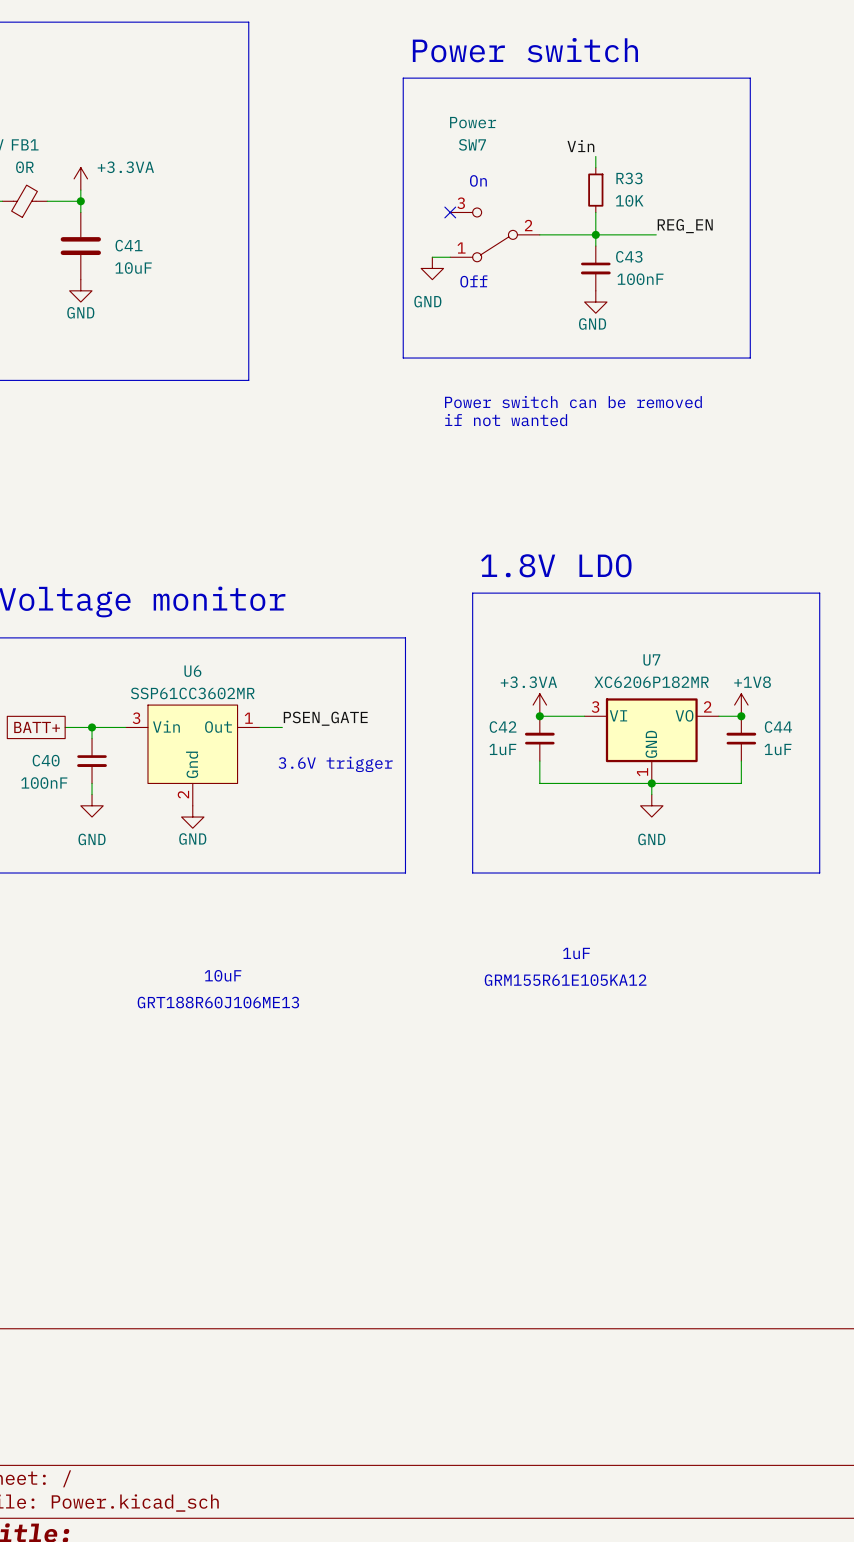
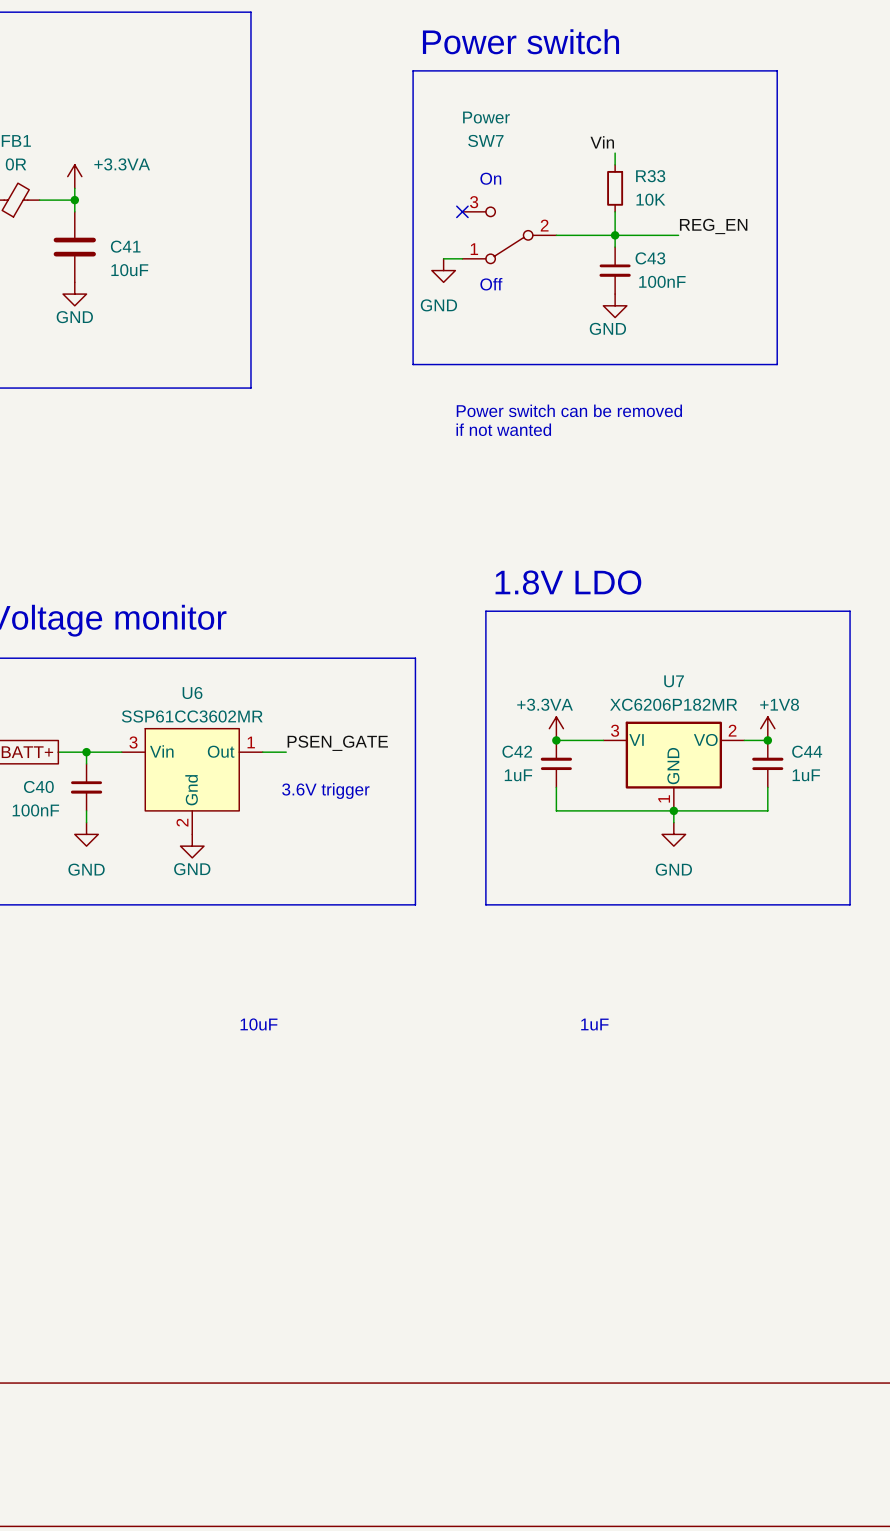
text position: 1uF (576, 953) -> 1uF (594, 1024)
text position: 10uF (223, 975) -> 10uF (259, 1024)
text: GRM155R61E105KA12 (565, 980) -> none
text: GRT188R60J106ME13 (218, 1002) -> none

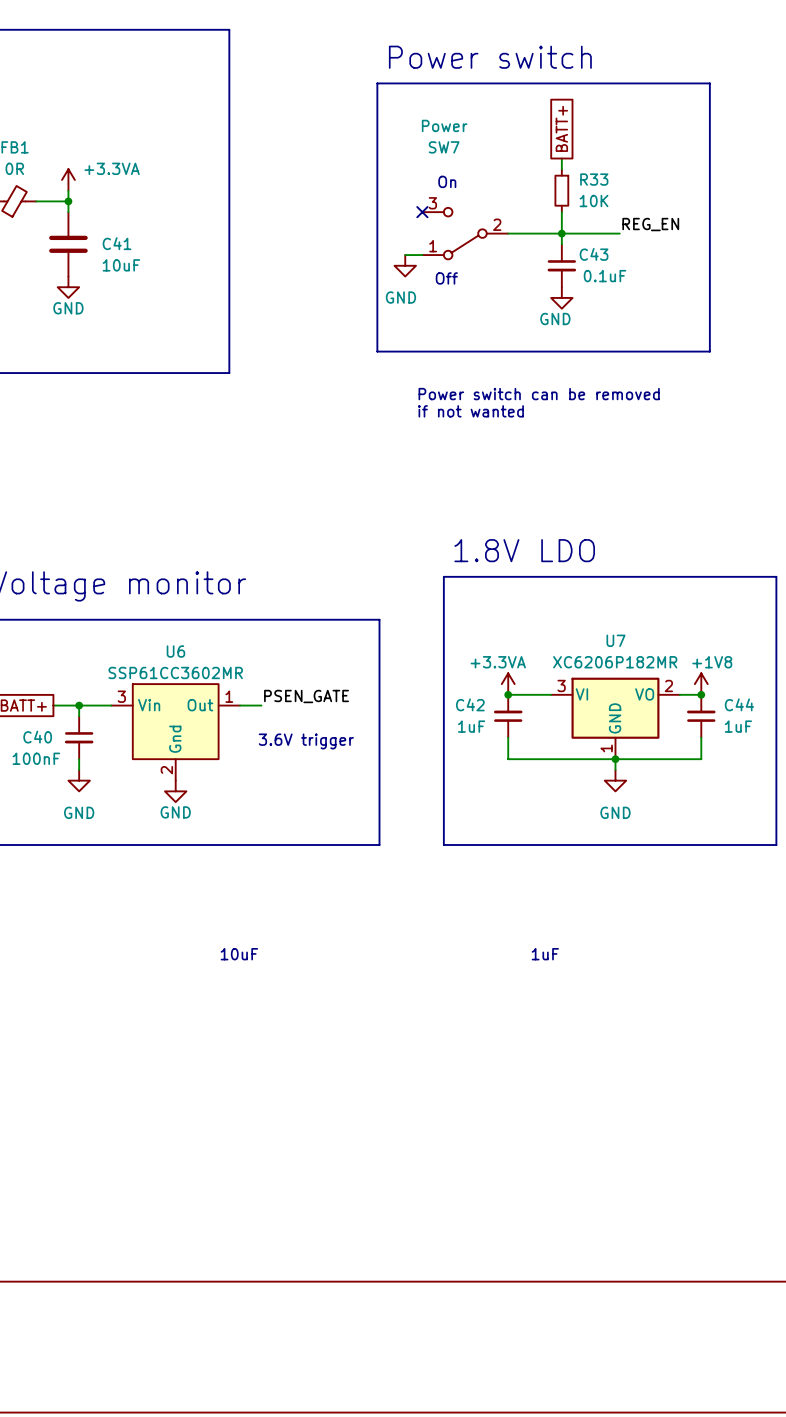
global label: none -> BATT+ (561, 128)
label: Vin (602, 142) -> none
C43 value: 100nF (662, 281) -> 0.1uF (605, 276)

